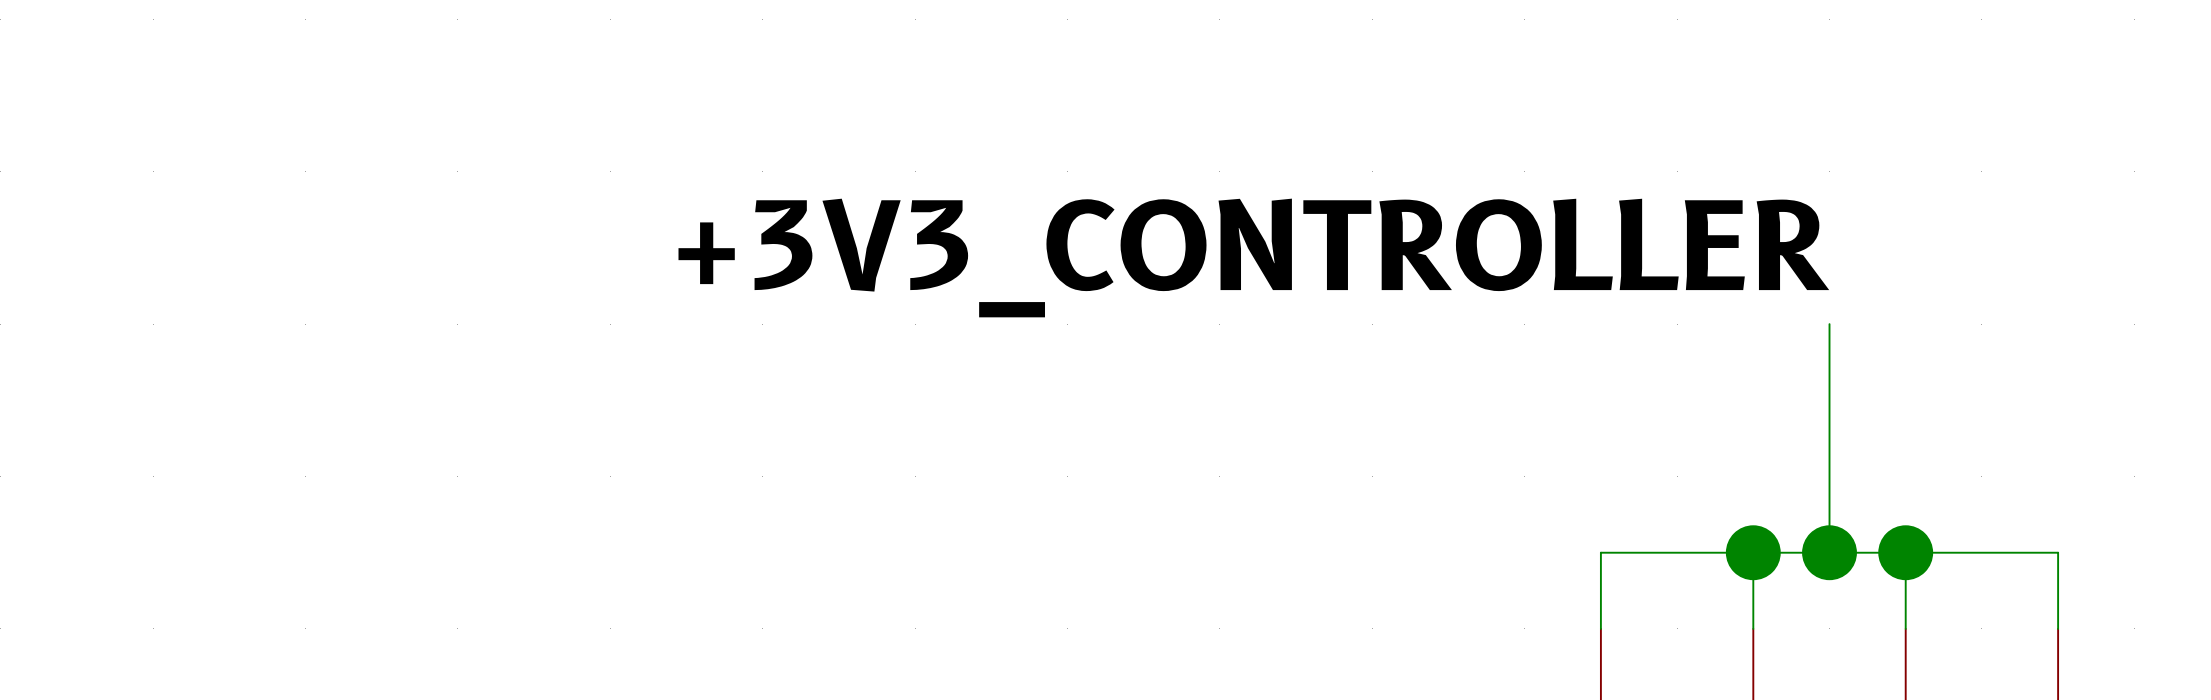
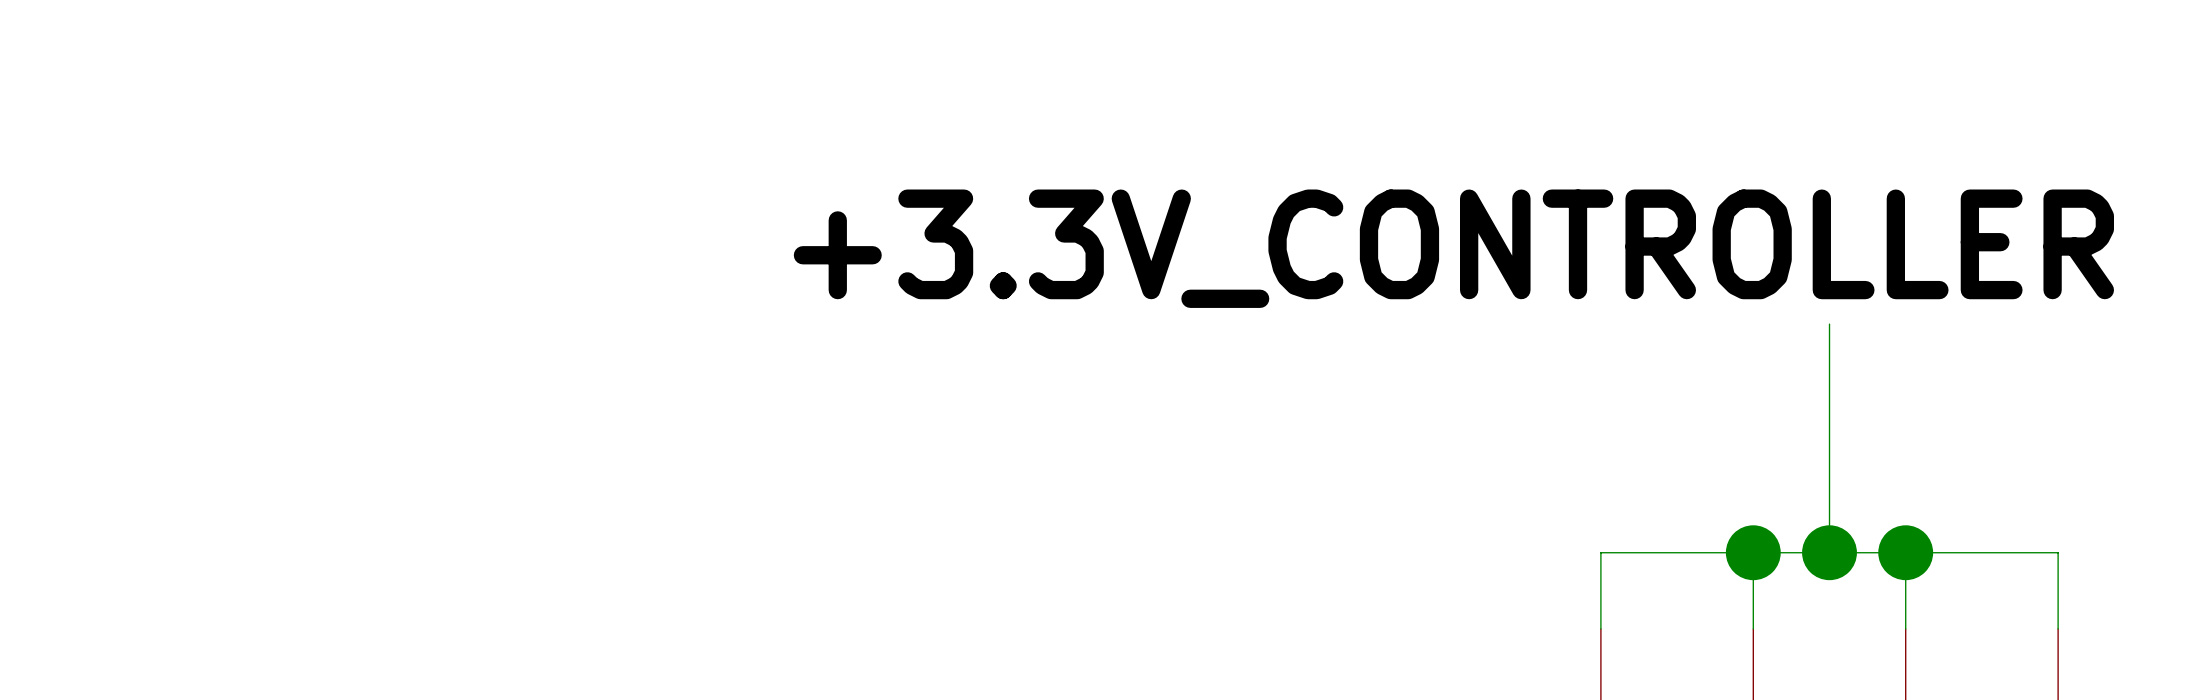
label: +3V3_CONTROLLER (1253, 257) -> +3.3V_CONTROLLER (1453, 248)

